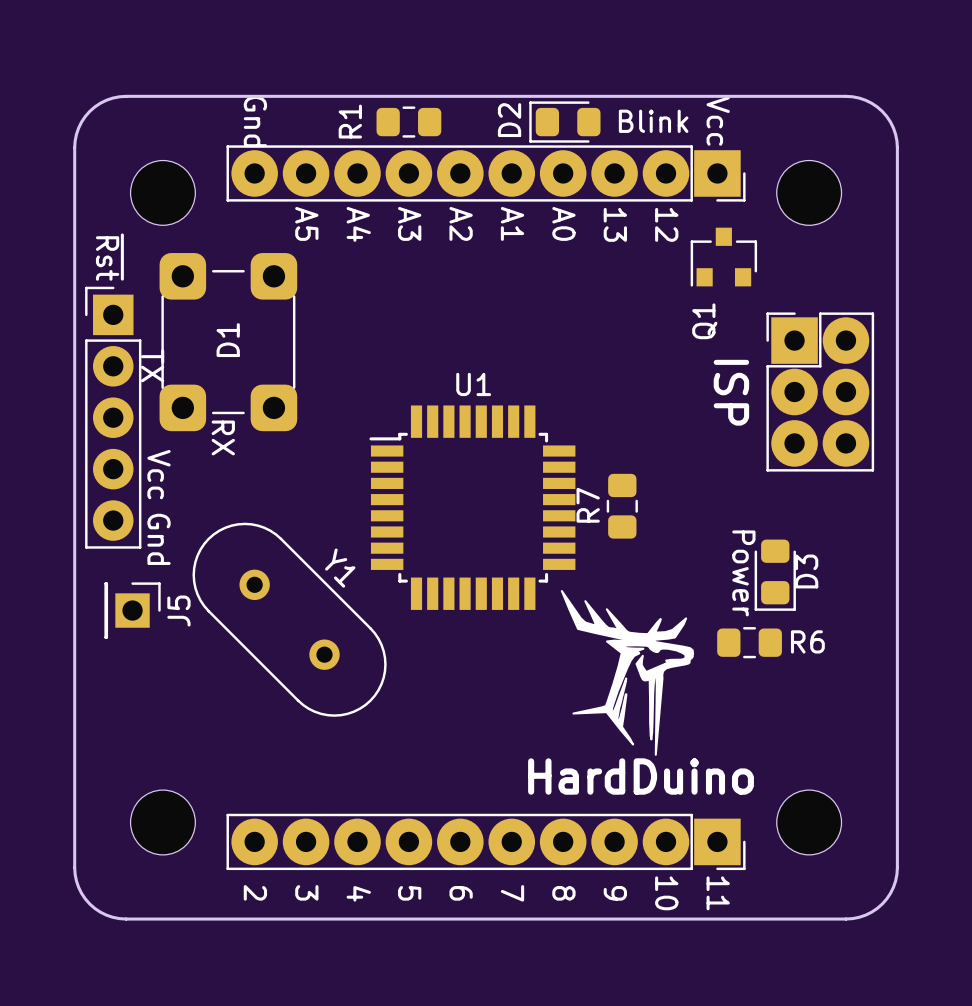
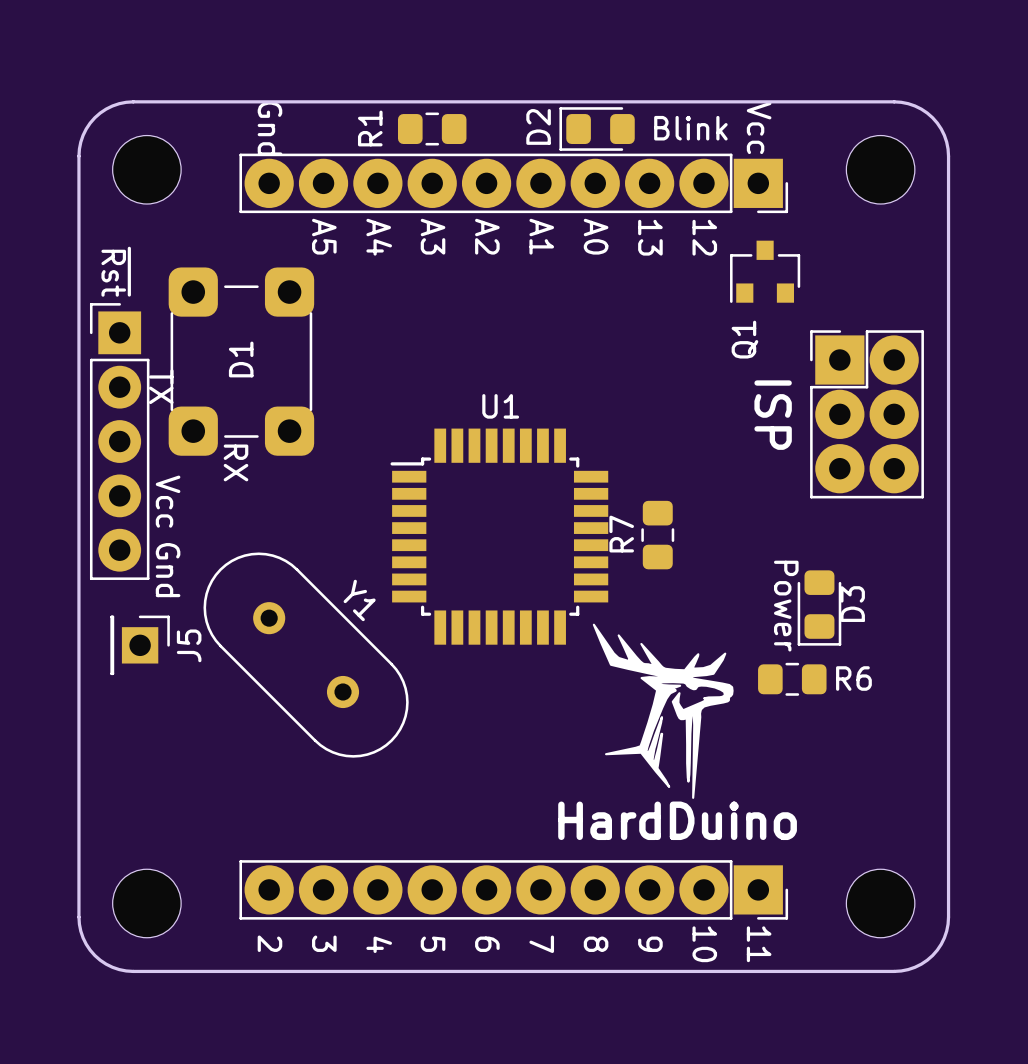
part position: (162, 192) -> (146, 169)
part position: (809, 192) -> (880, 169)
part position: (162, 822) -> (146, 903)
part position: (809, 822) -> (880, 903)

